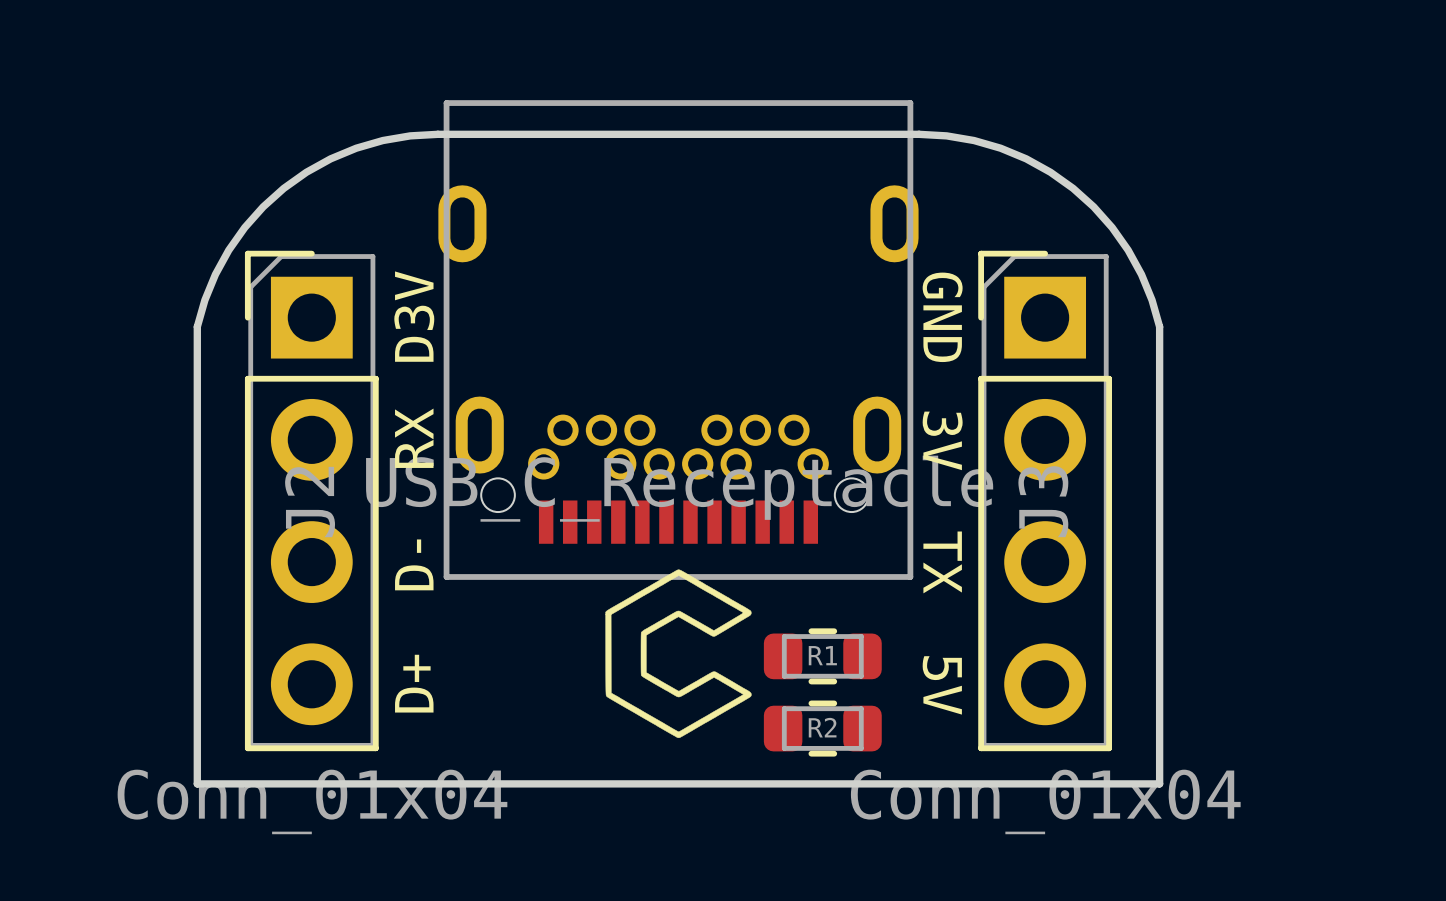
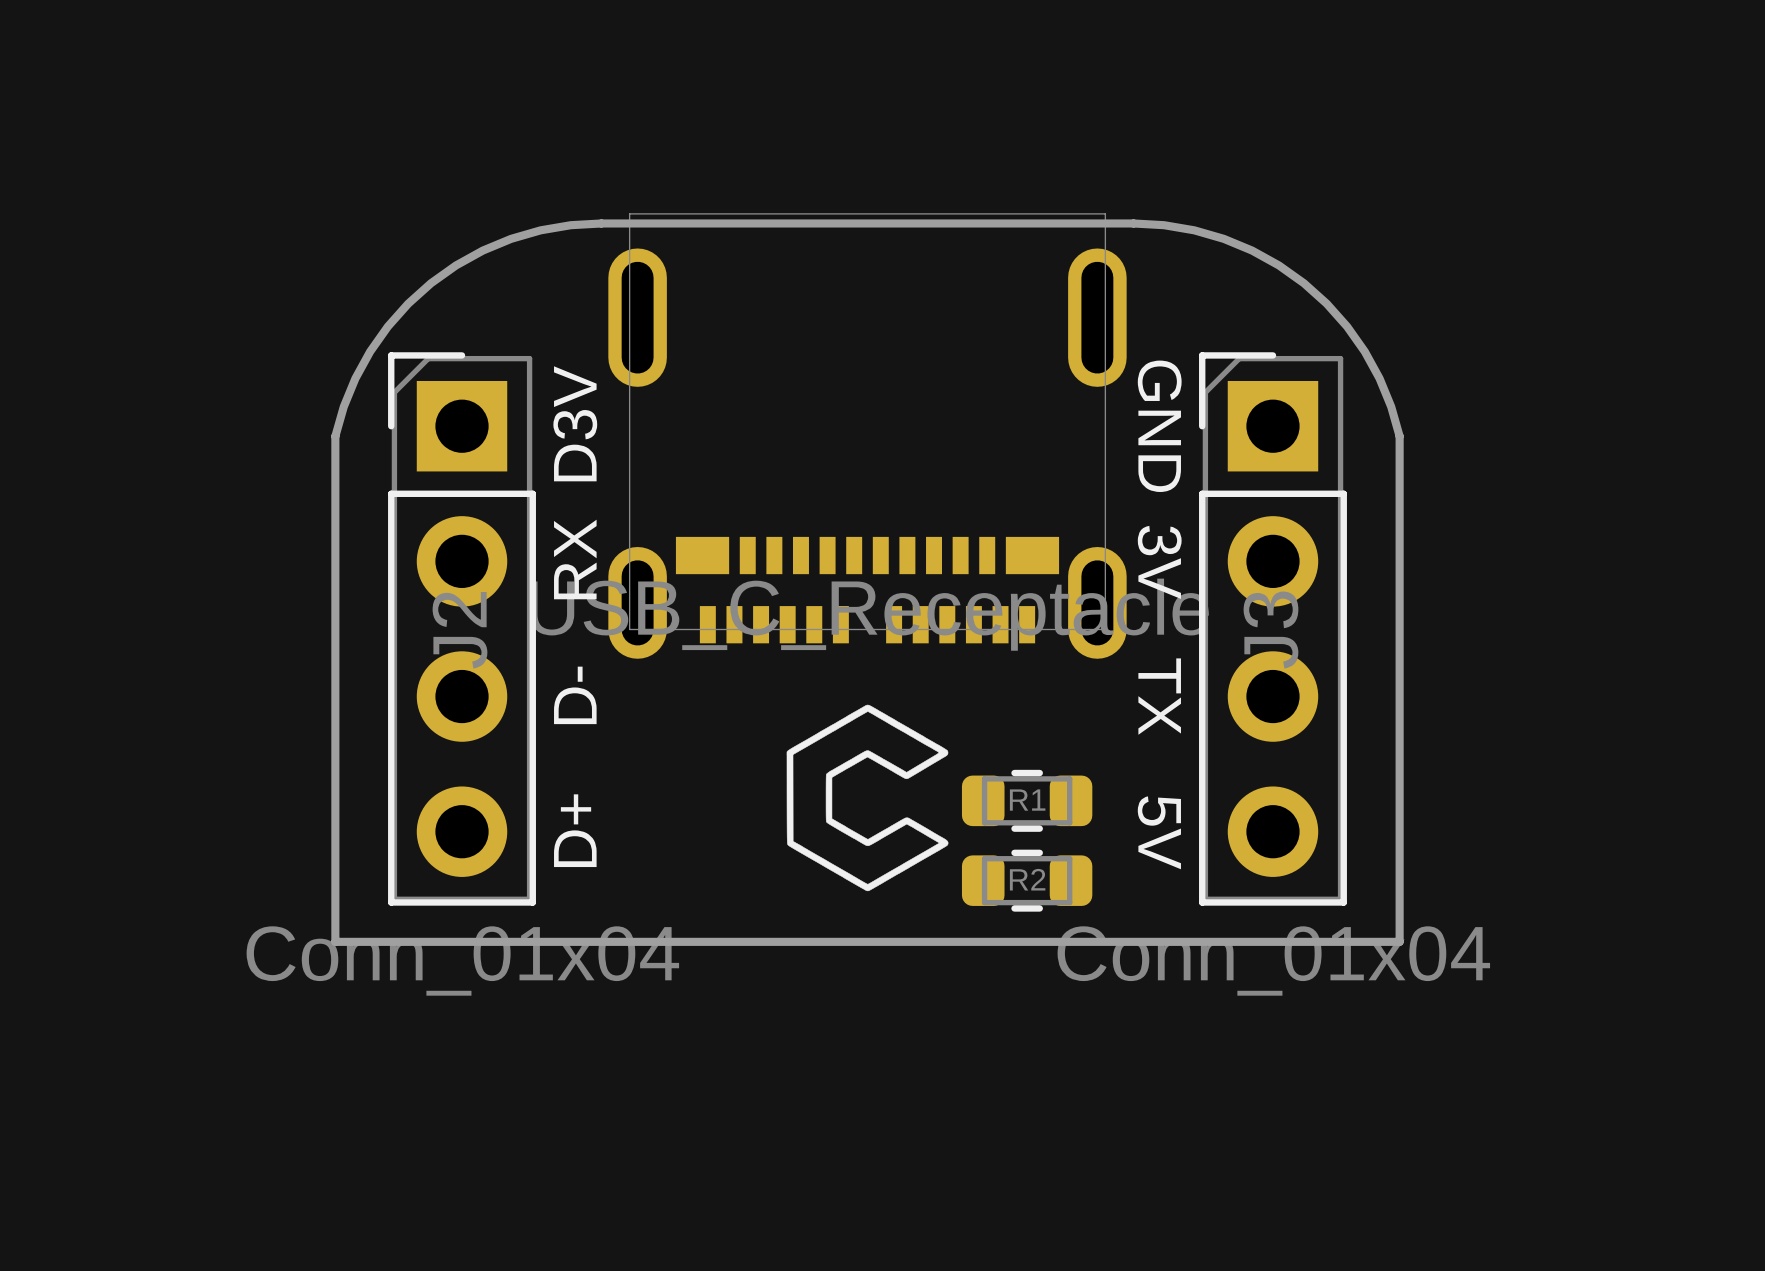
part footprint: [438, 100, 919, 580] -> [608, 213, 1127, 659]

